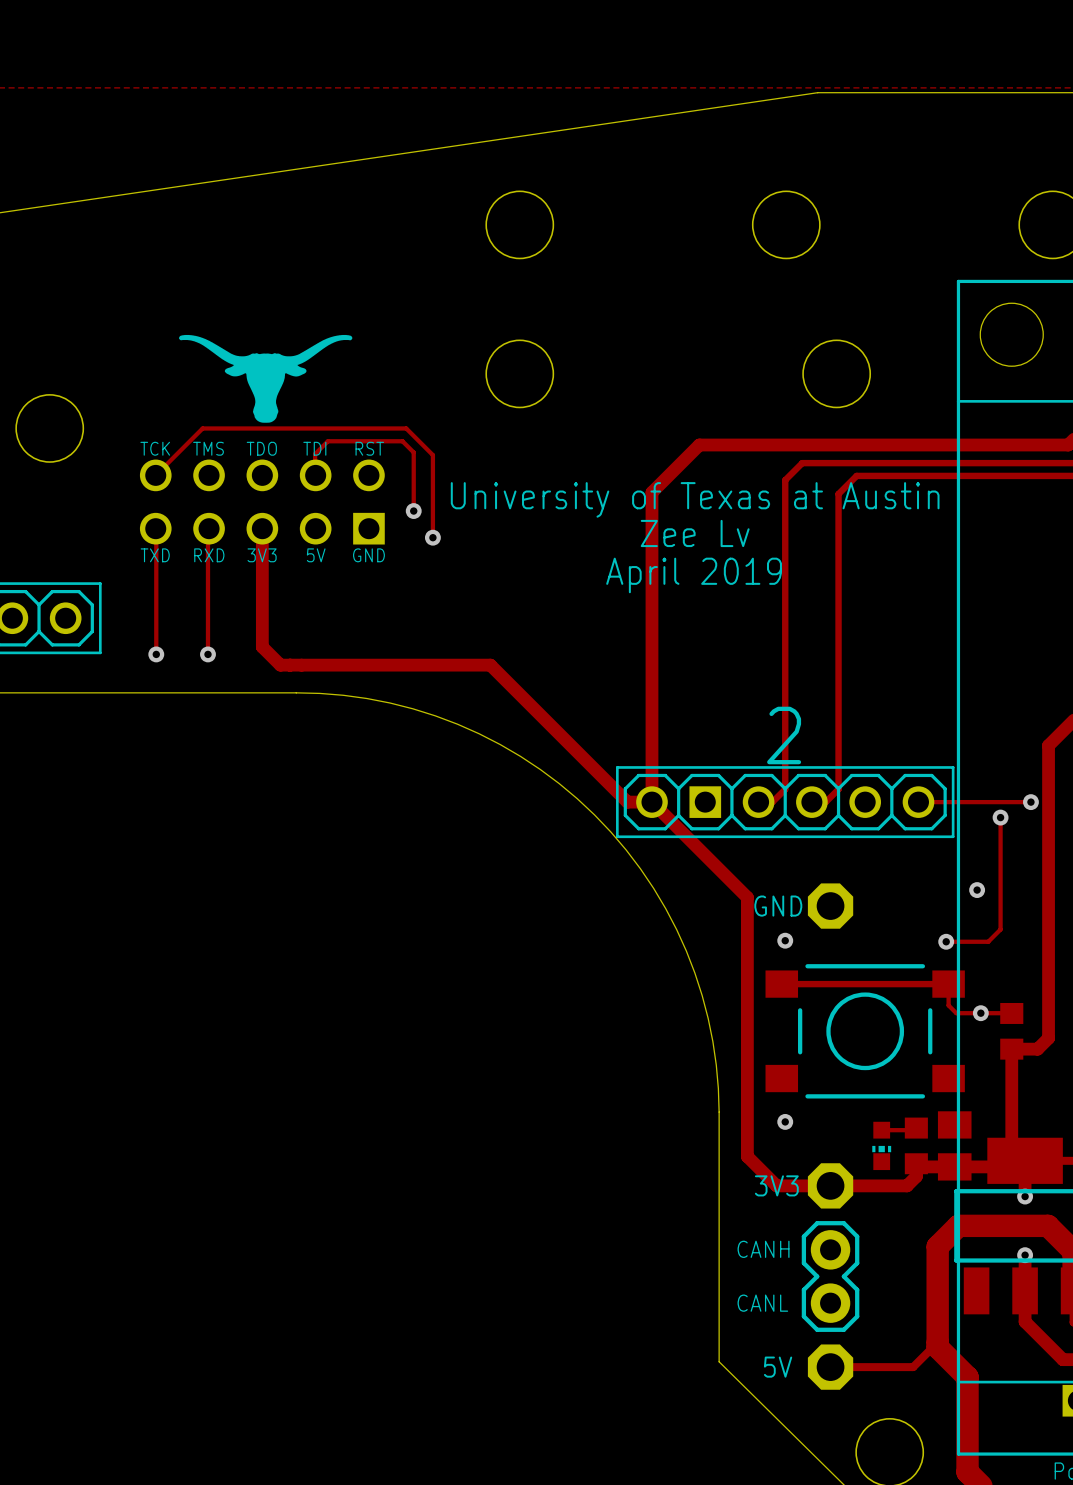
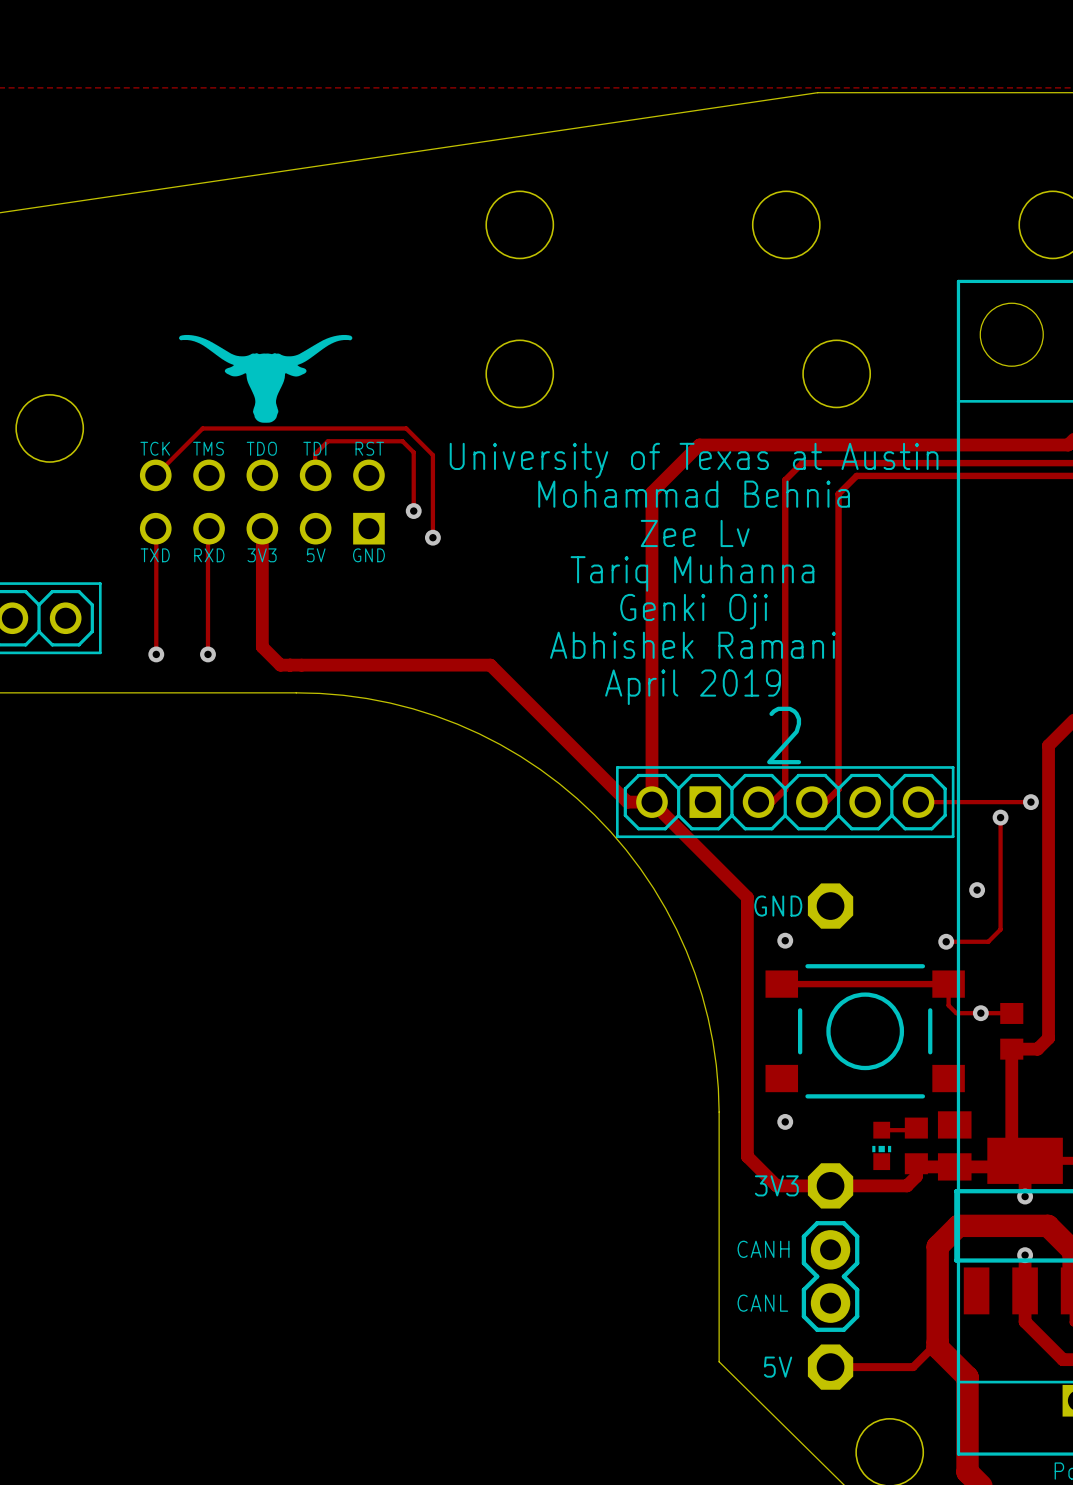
text: none -> University of Texas at Austin (694, 460)
text: University of Texas at Austin (695, 499) -> Mohammad Behnia (694, 494)
text: April 2019 (694, 575) -> Tariq Muhanna (692, 573)
text: none -> Genki Oji (694, 611)
text: none -> Abhishek Ramani (693, 645)
text: none -> April 2019 (693, 687)

